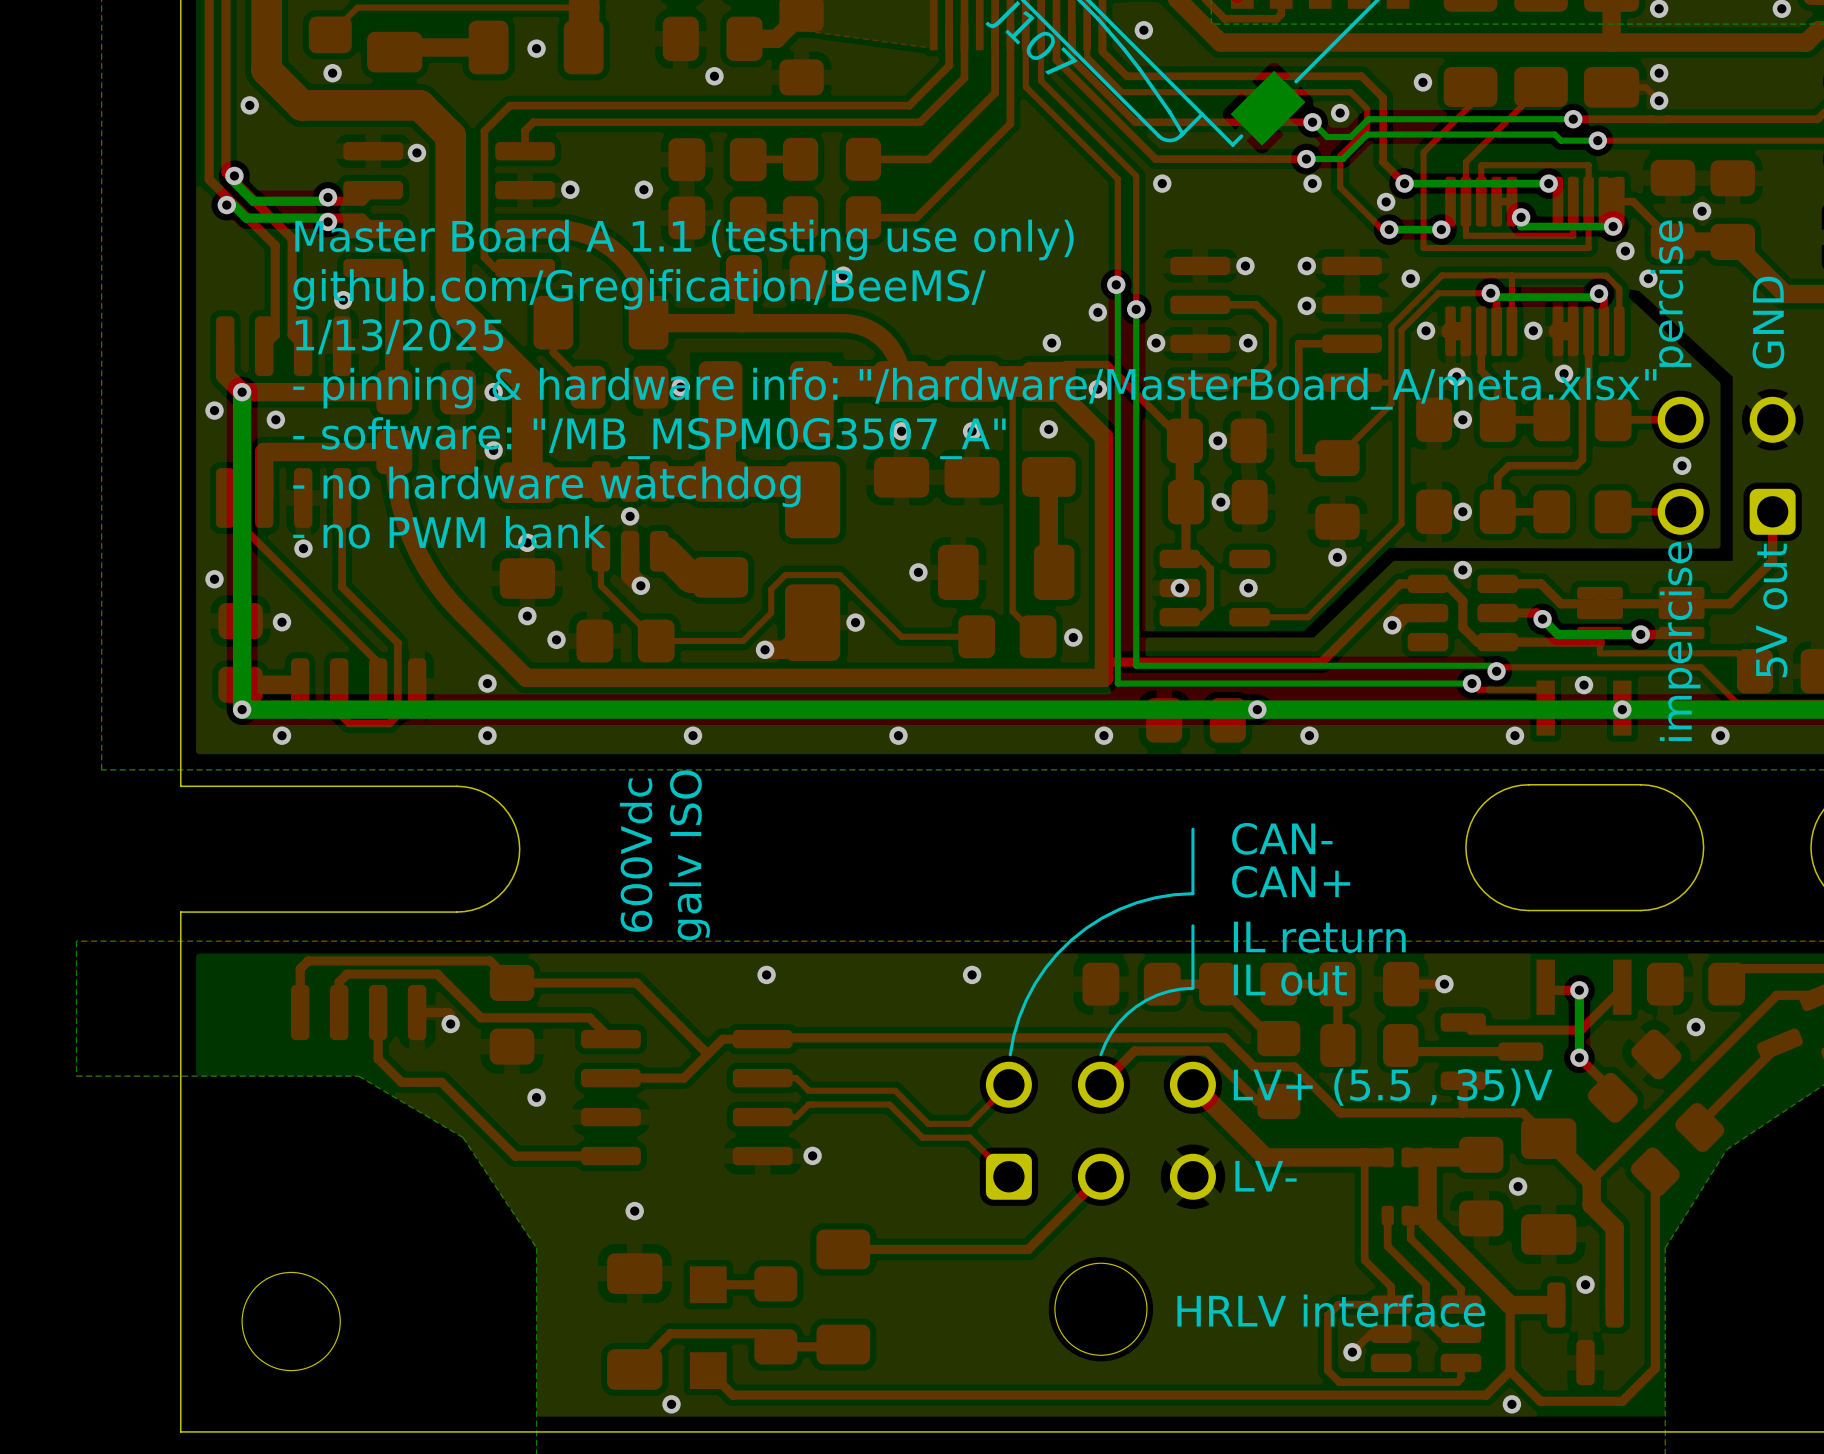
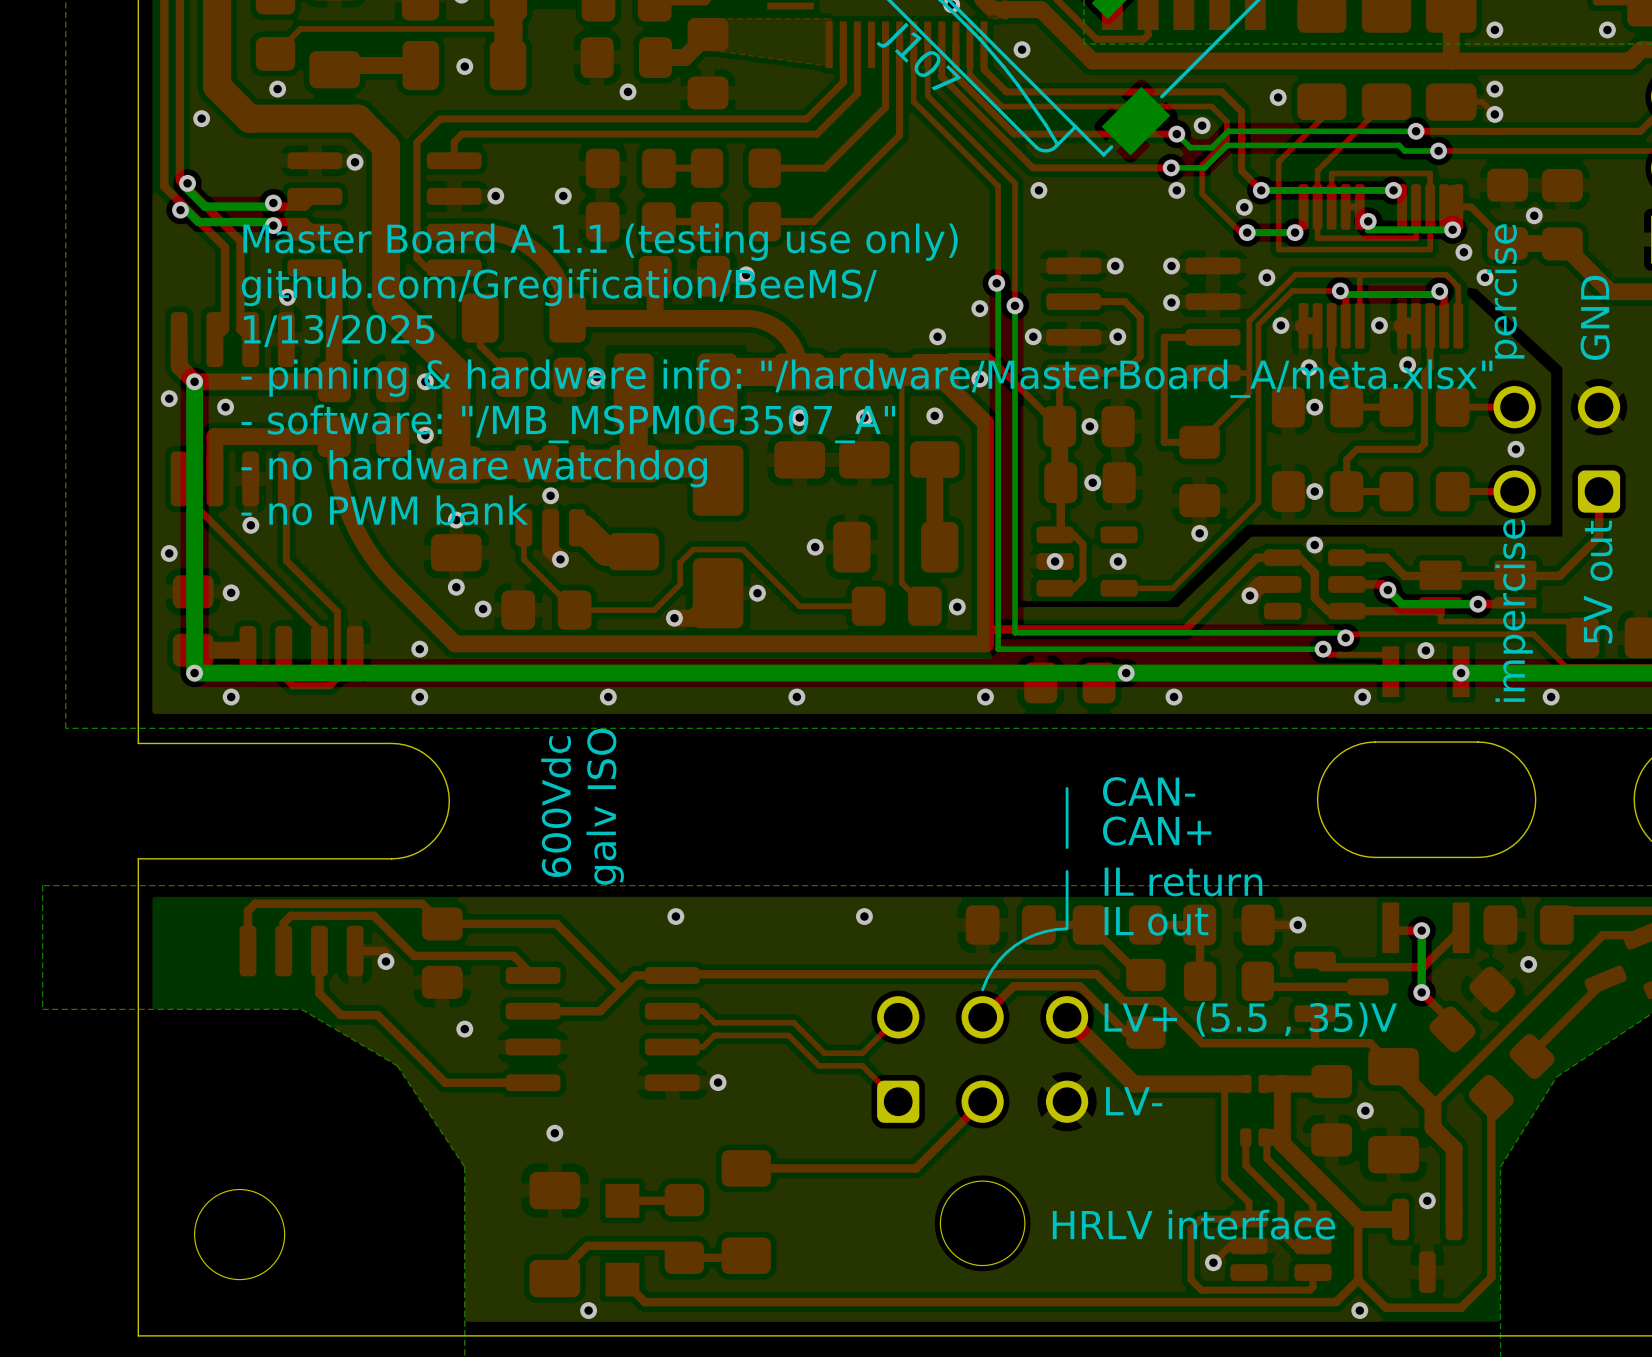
line: (1192, 829) (1192, 835) -> none
line: (1192, 893) (1155, 897) (1136, 902) (1102, 918) (1071, 940) (1045, 967) (1026, 1000) (1013, 1036) (1010, 1054) -> (1067, 841) (1067, 847)

